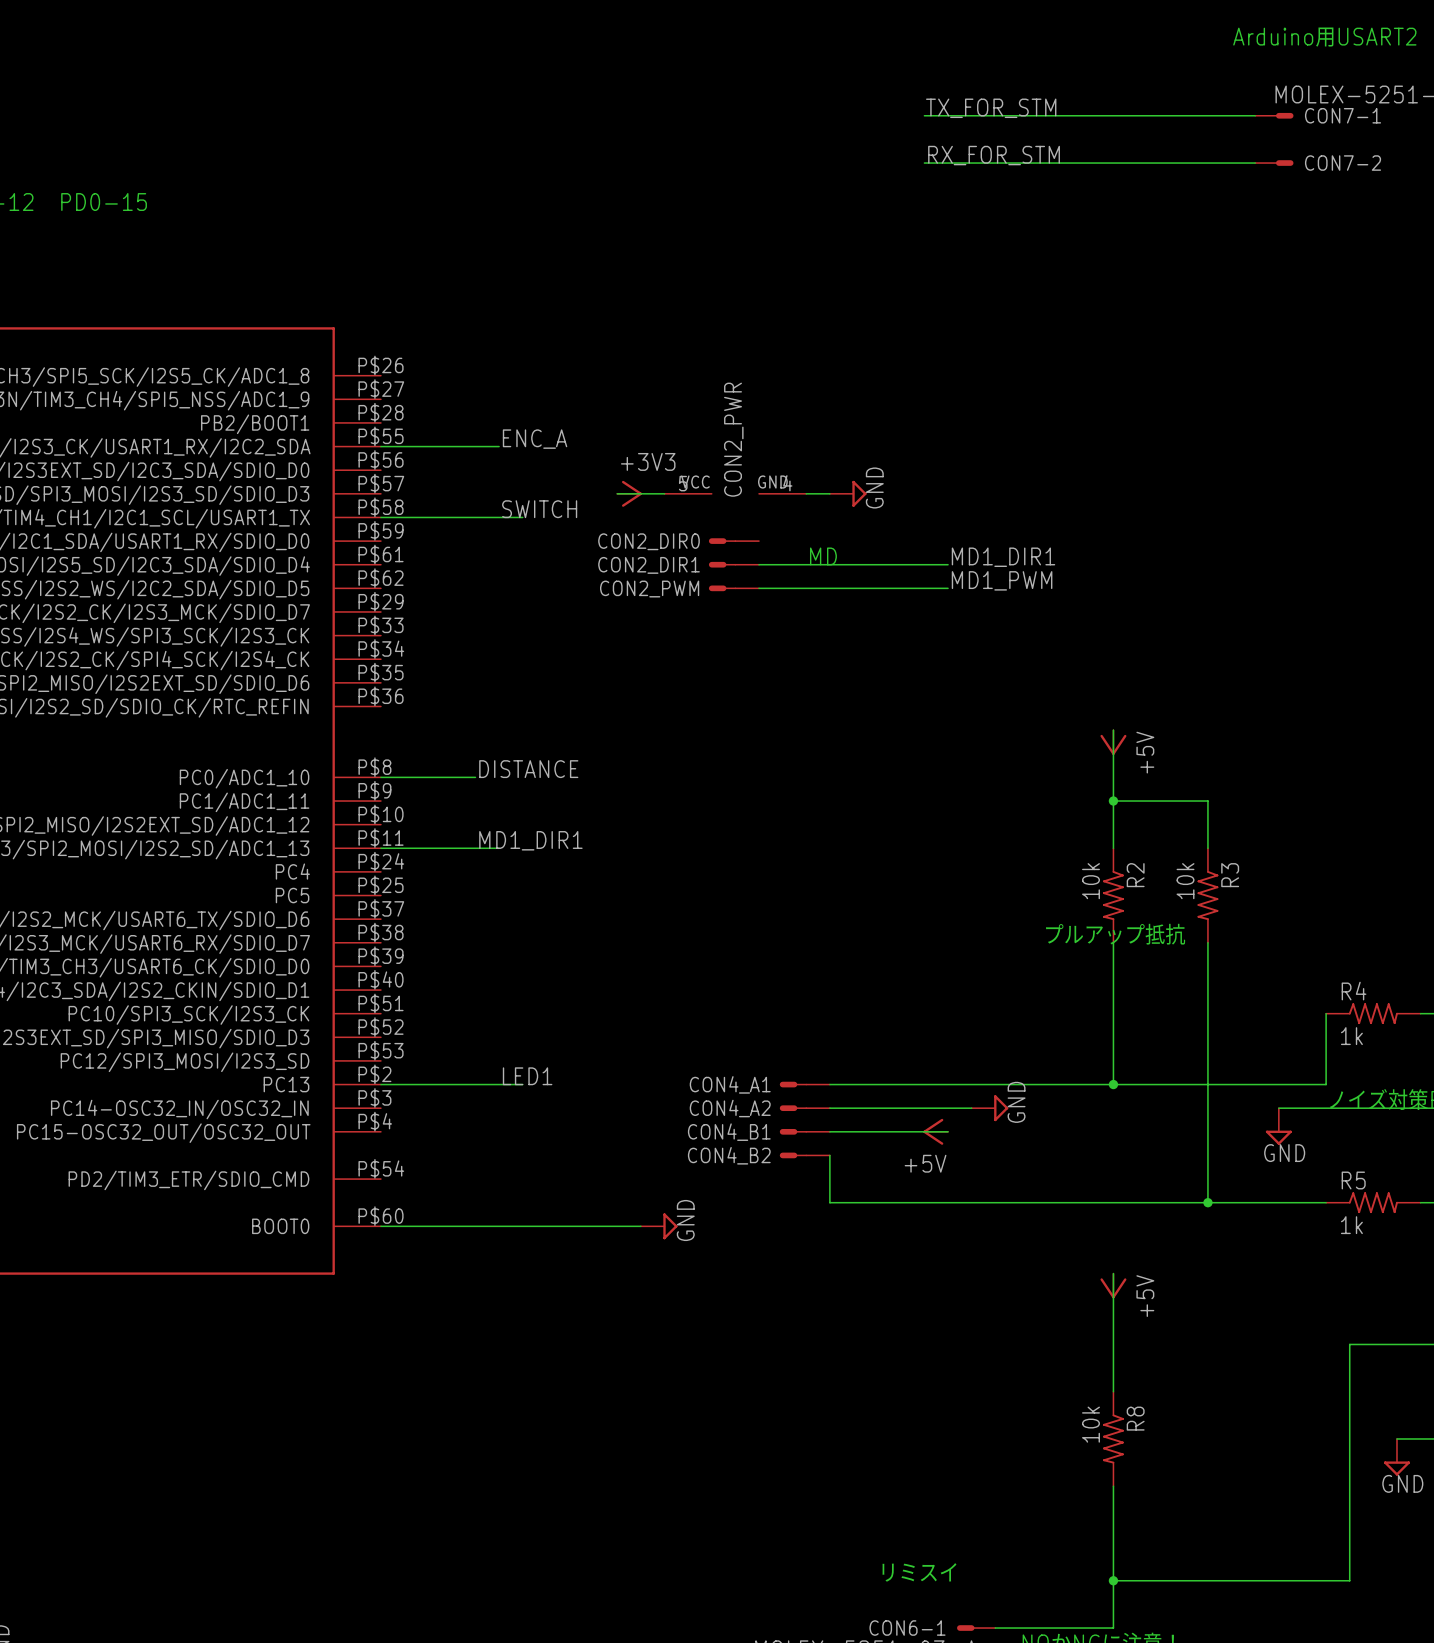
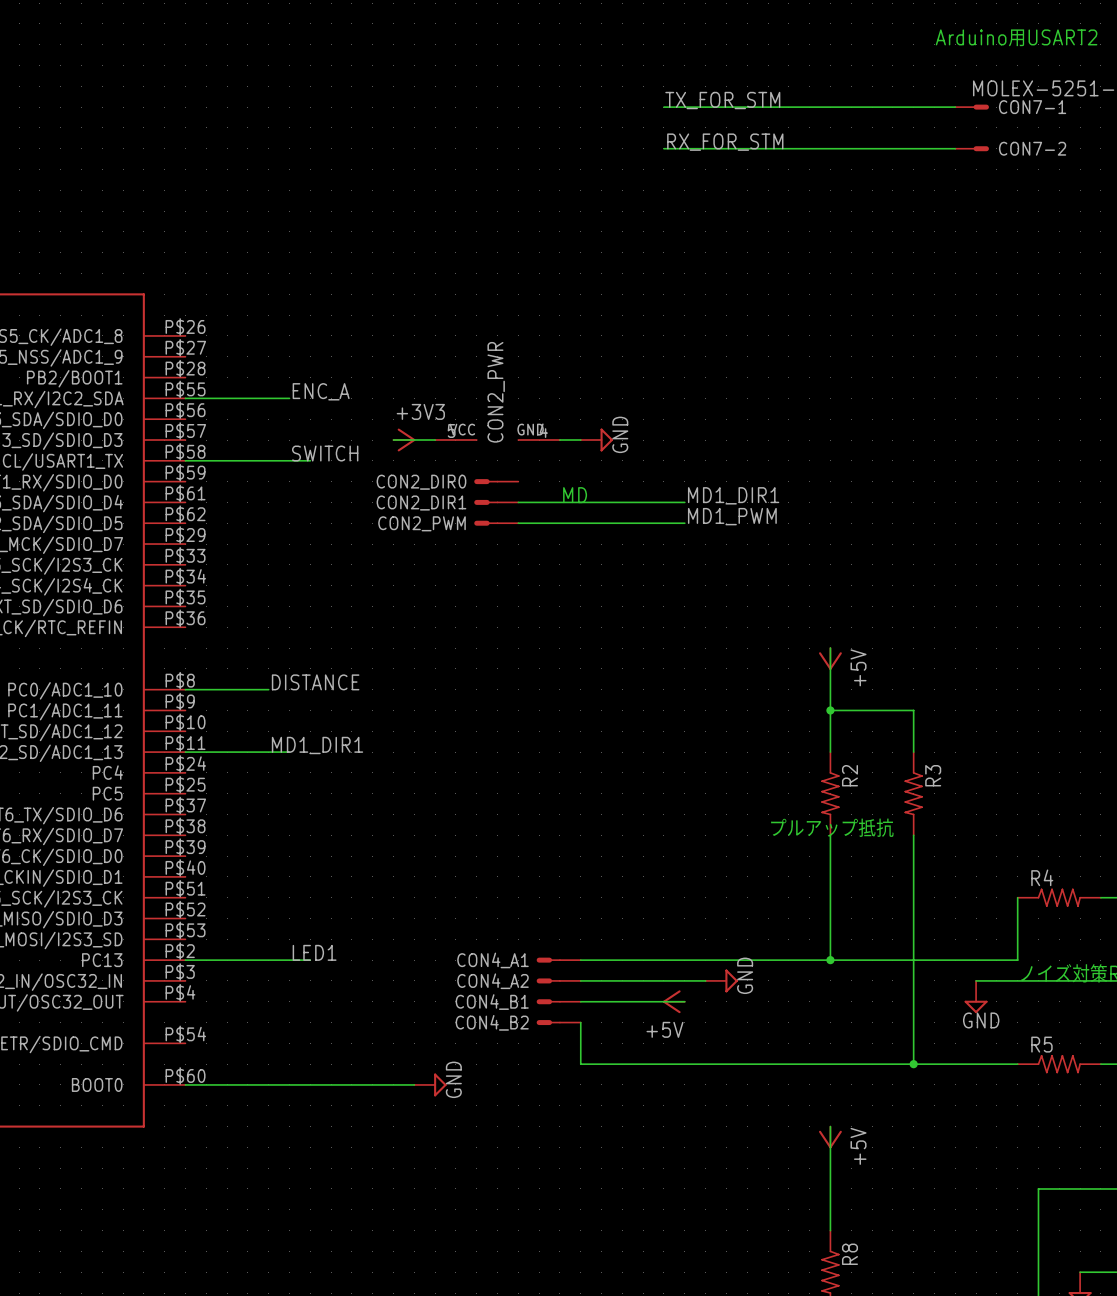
R2 value: 10k (1090, 881) -> none
R3 value: 10k (1185, 881) -> none
R4 value: 1k (1351, 1036) -> none
R5 value: 1k (1351, 1225) -> none
R8 value: 10k (1090, 1424) -> none

